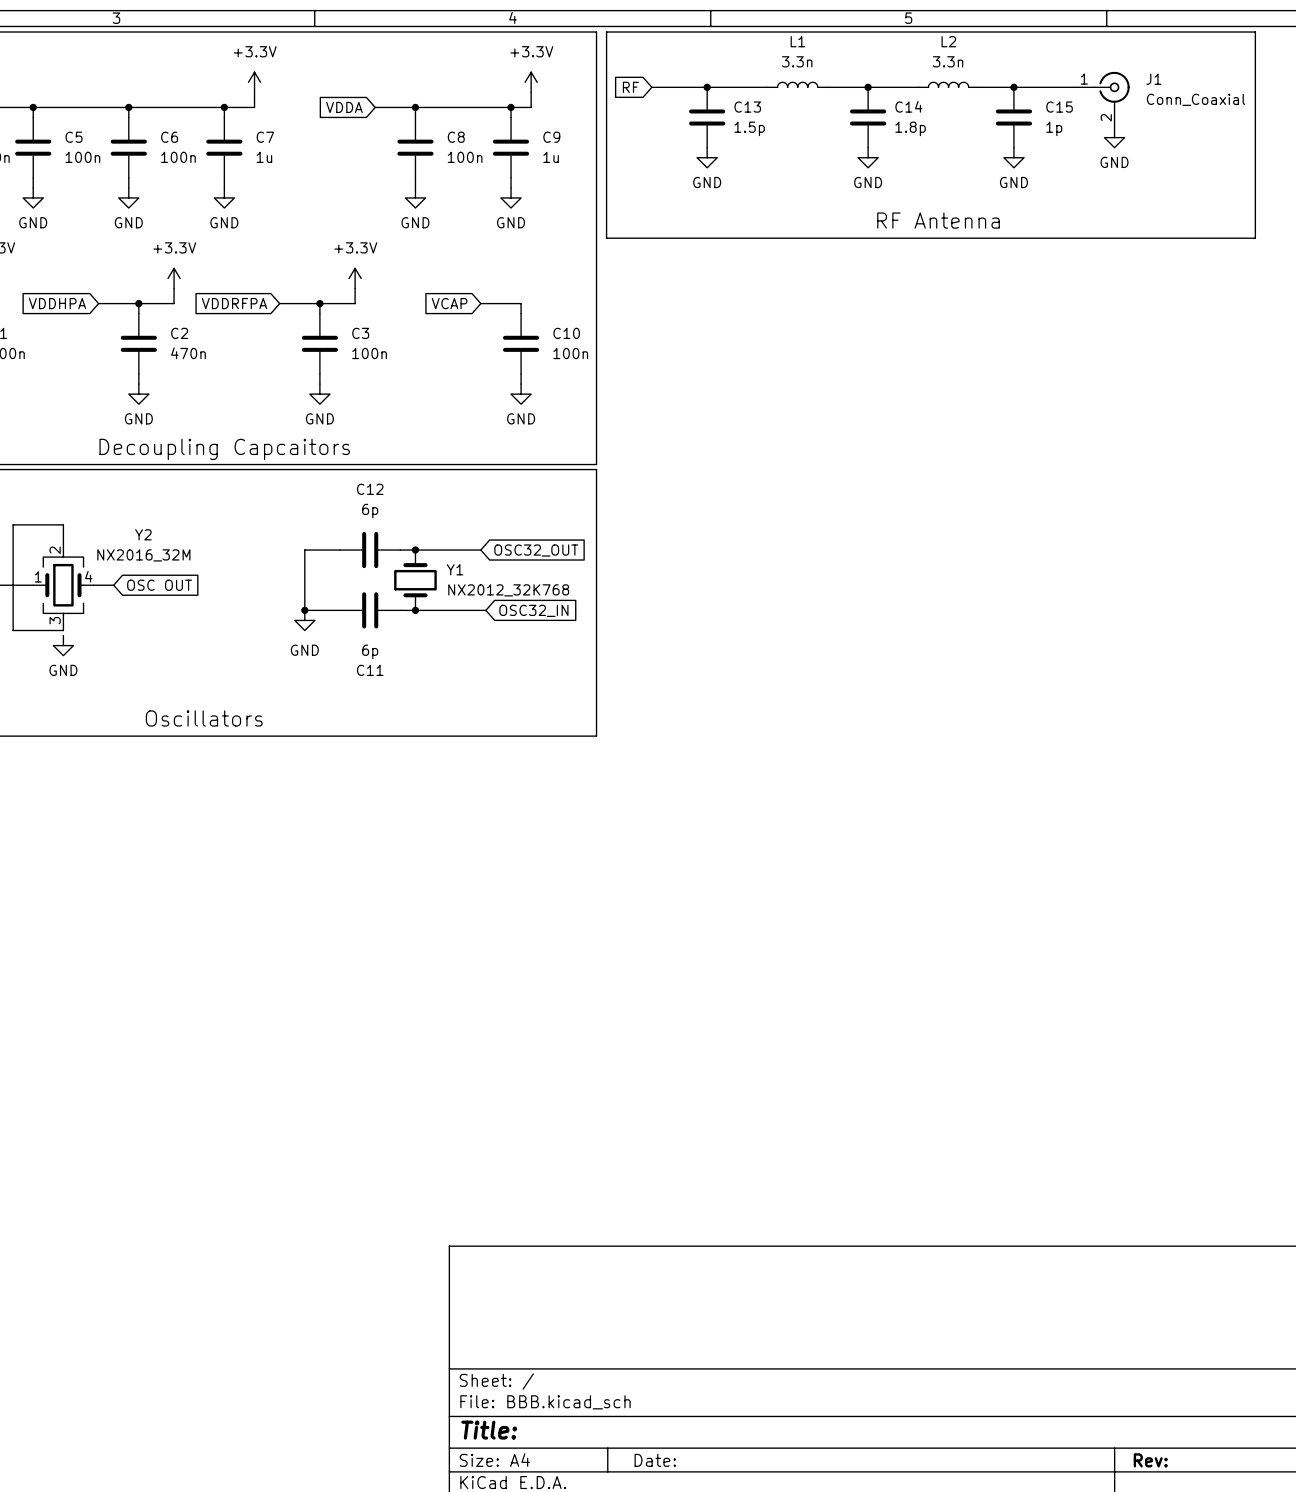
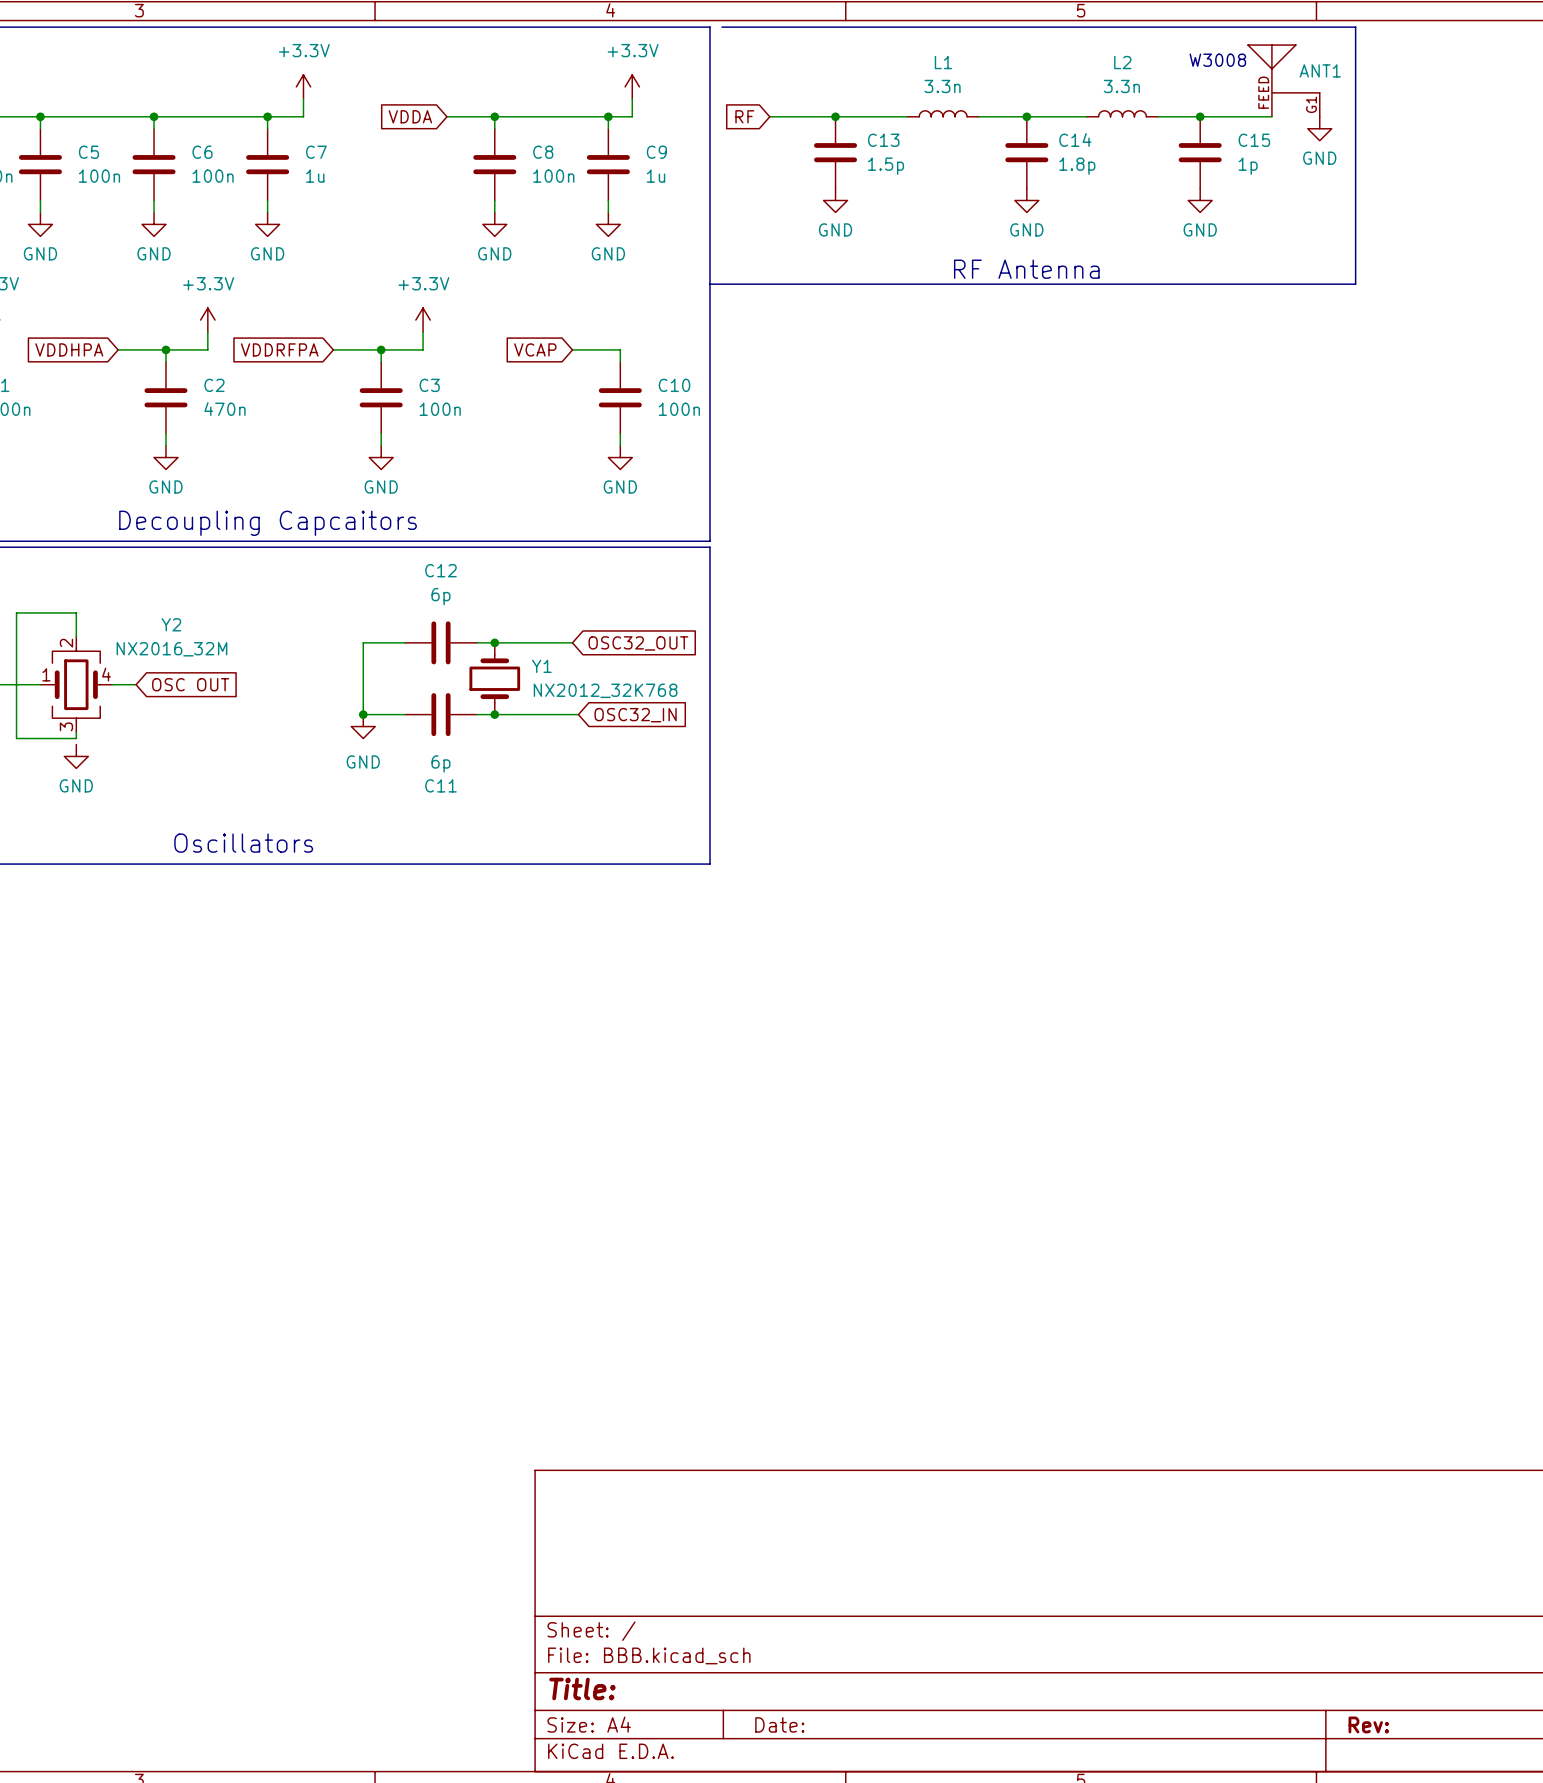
line: (606, 32) (606, 238) (1255, 238) (1255, 32) (1139, 32) -> (709, 284) (1355, 284) (1355, 27)
text: none -> W3008 (1217, 60)
ANT1: none -> (1283, 80)
L1 position: (797, 84) -> (943, 113)
L2 position: (948, 84) -> (1122, 113)
global label position: RF (630, 87) -> RF (744, 116)
wire: (651, 87) (767, 87) -> (769, 116) (907, 116)
junction position: (707, 87) -> (835, 116)
wire: (827, 87) (918, 87) -> (979, 116) (1086, 116)
junction position: (868, 87) -> (1026, 116)
wire: (978, 87) (1074, 87) -> (1158, 116) (1271, 116)
junction position: (1013, 87) -> (1200, 116)
J1: Conn_Coaxial (1101, 99) -> none
C13 position: (707, 117) -> (835, 152)
C14 position: (868, 117) -> (1026, 152)
C15 position: (1013, 117) -> (1200, 152)
power symbol position: GND (1114, 137) -> GND (1319, 128)
power symbol position: GND (707, 157) -> GND (835, 200)
power symbol position: GND (868, 157) -> GND (1026, 200)
power symbol position: GND (1013, 157) -> GND (1200, 200)
text position: RF Antenna (938, 220) -> RF Antenna (1026, 269)

